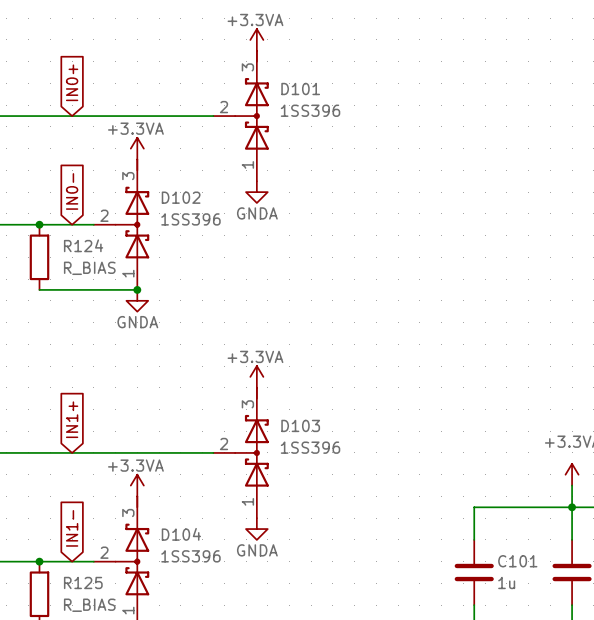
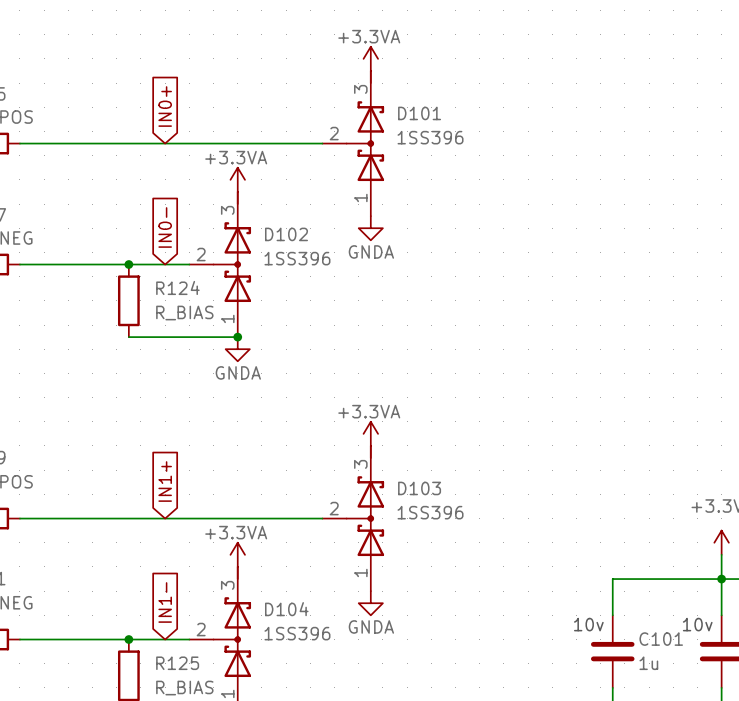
text: none -> 10v (588, 624)
text: none -> 10v (697, 624)

